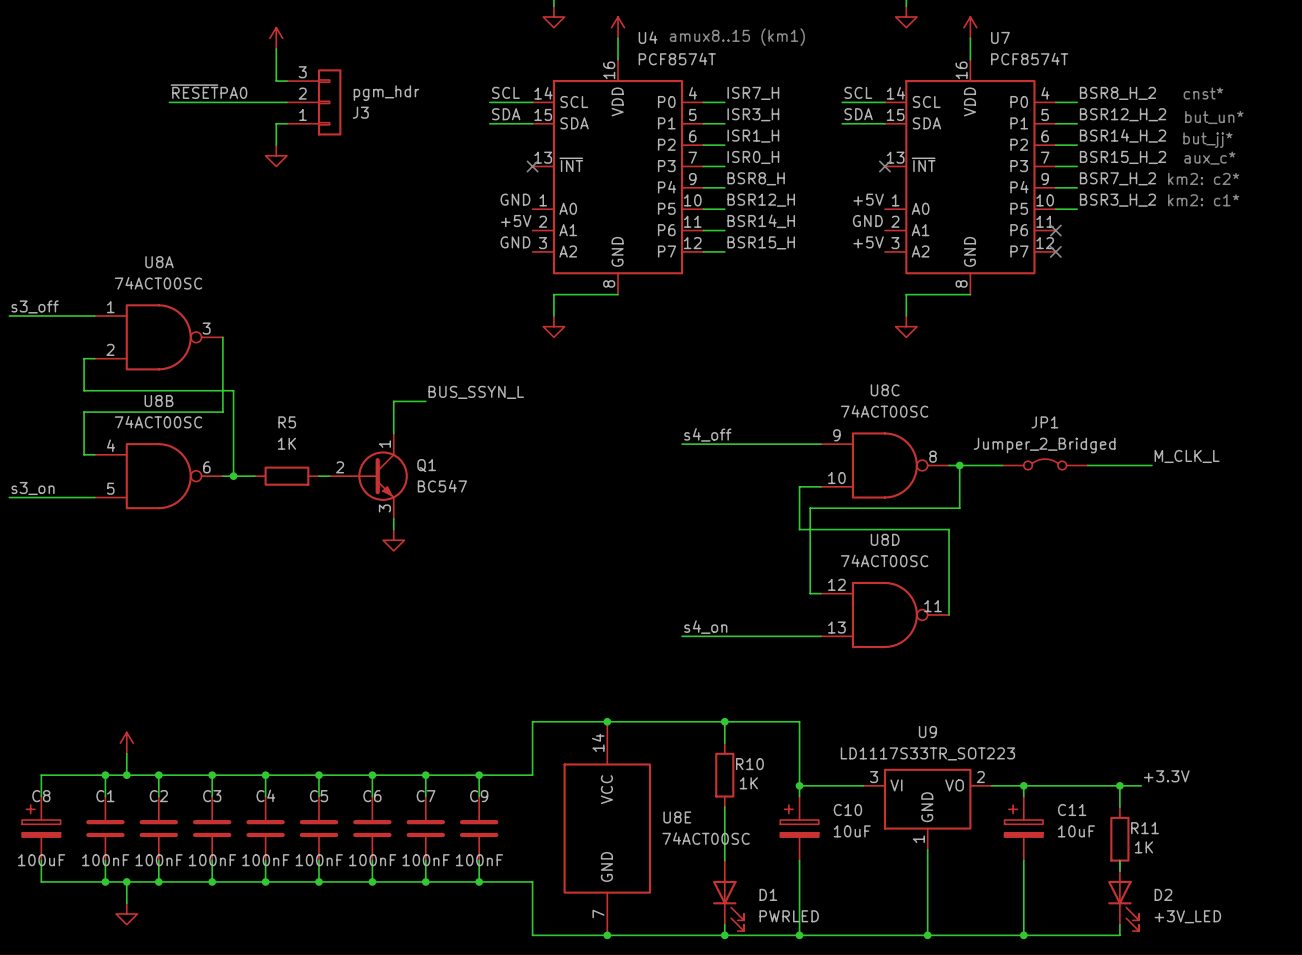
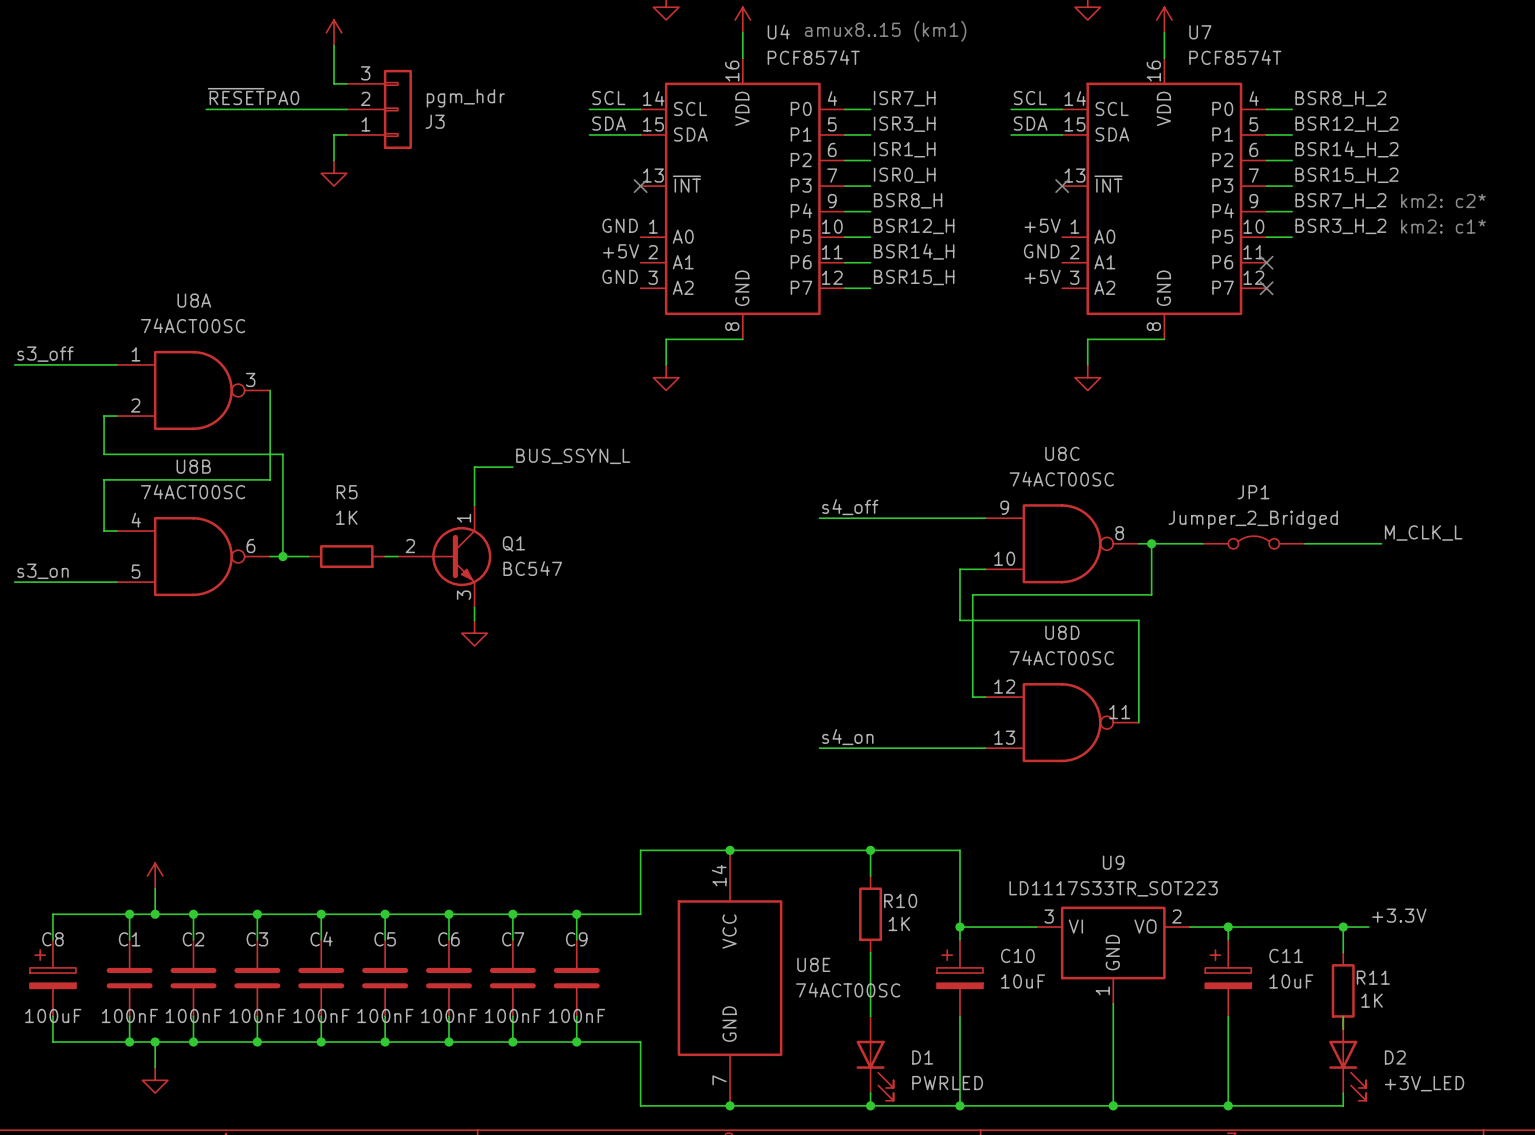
text: cnst* (1203, 93) -> none
text: but_un* (1214, 117) -> none
text: but_jj* (1207, 140) -> none
text: aux_c* (1209, 158) -> none

